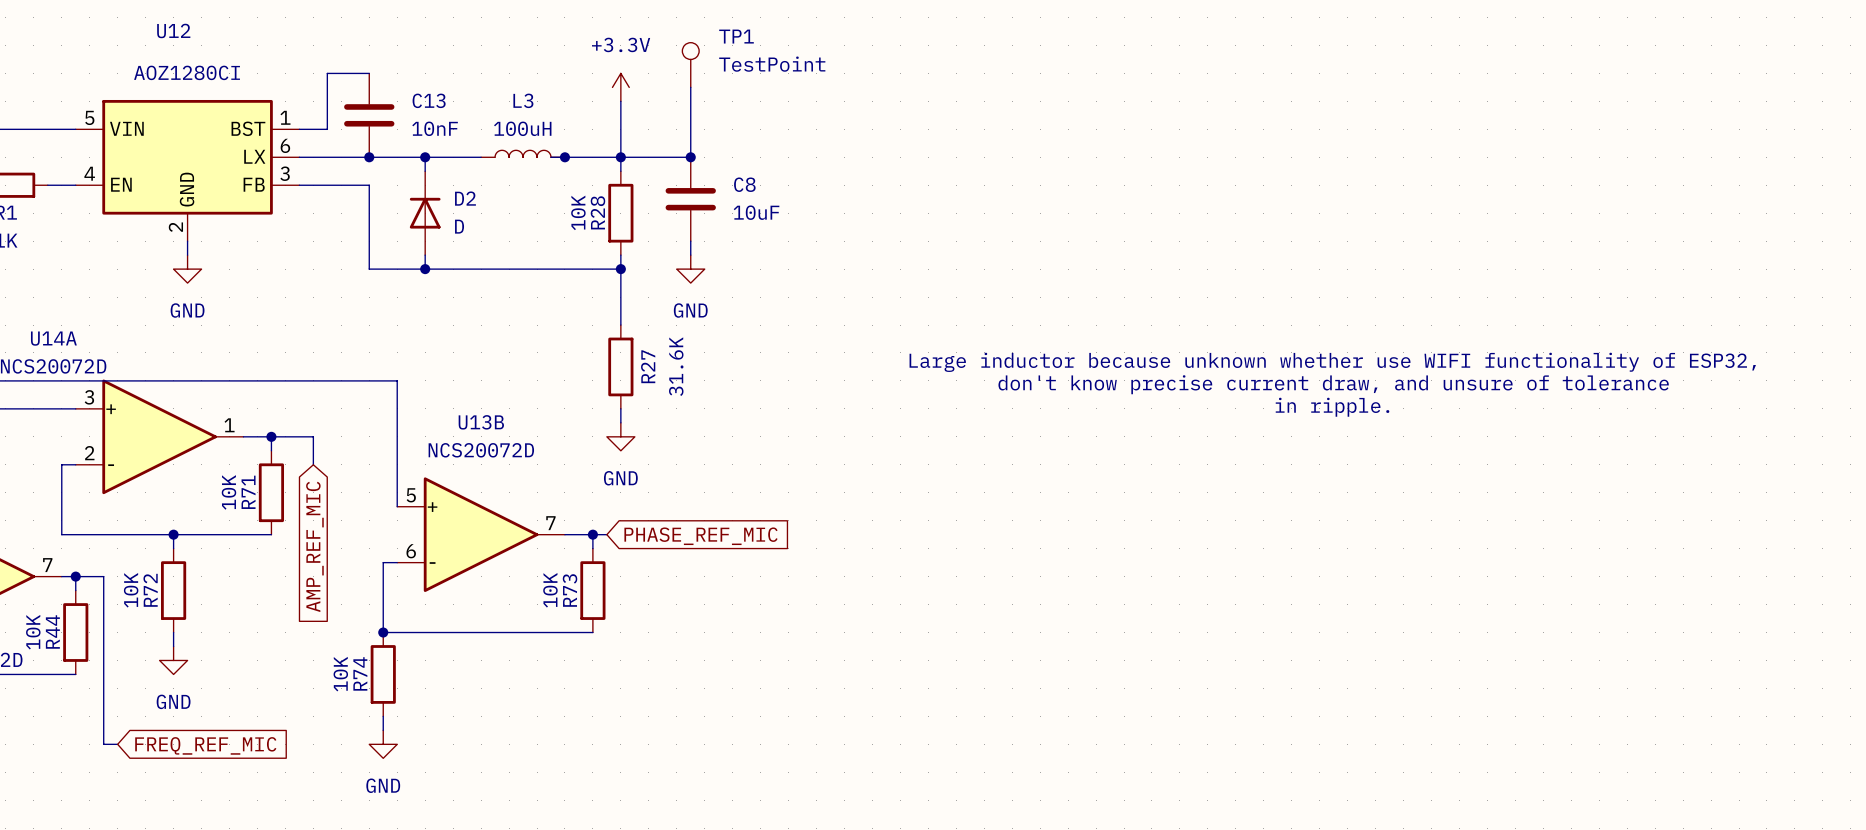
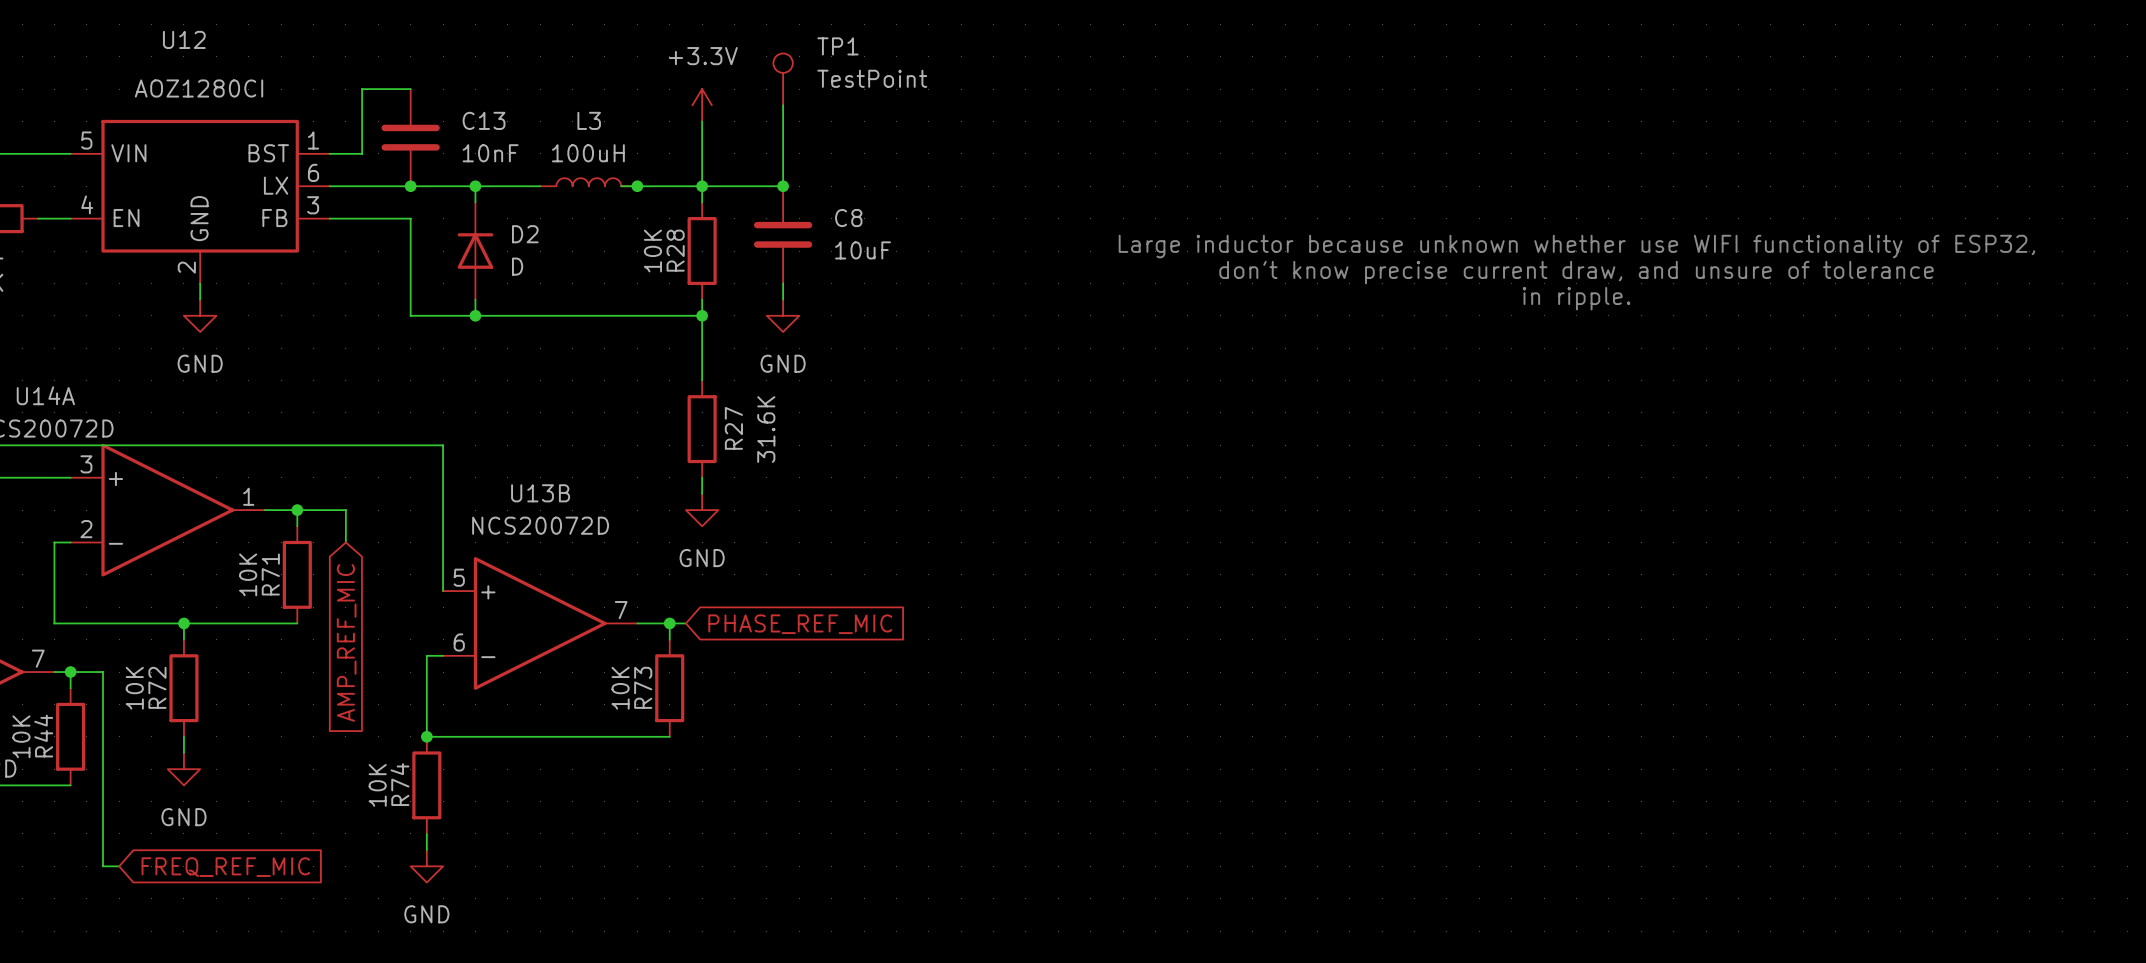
text position: Large inductor because unknown whether use WIFI functionality of ESP32, (1332, 362) -> Large inductor because unknown whether use WIFI functionality of ESP32, (1576, 246)
text position: don't know precise current draw, and unsure of tolerance (1333, 384) -> don't know precise current draw, and unsure of tolerance (1576, 272)
text position: in ripple. (1332, 407) -> in ripple. (1576, 298)

